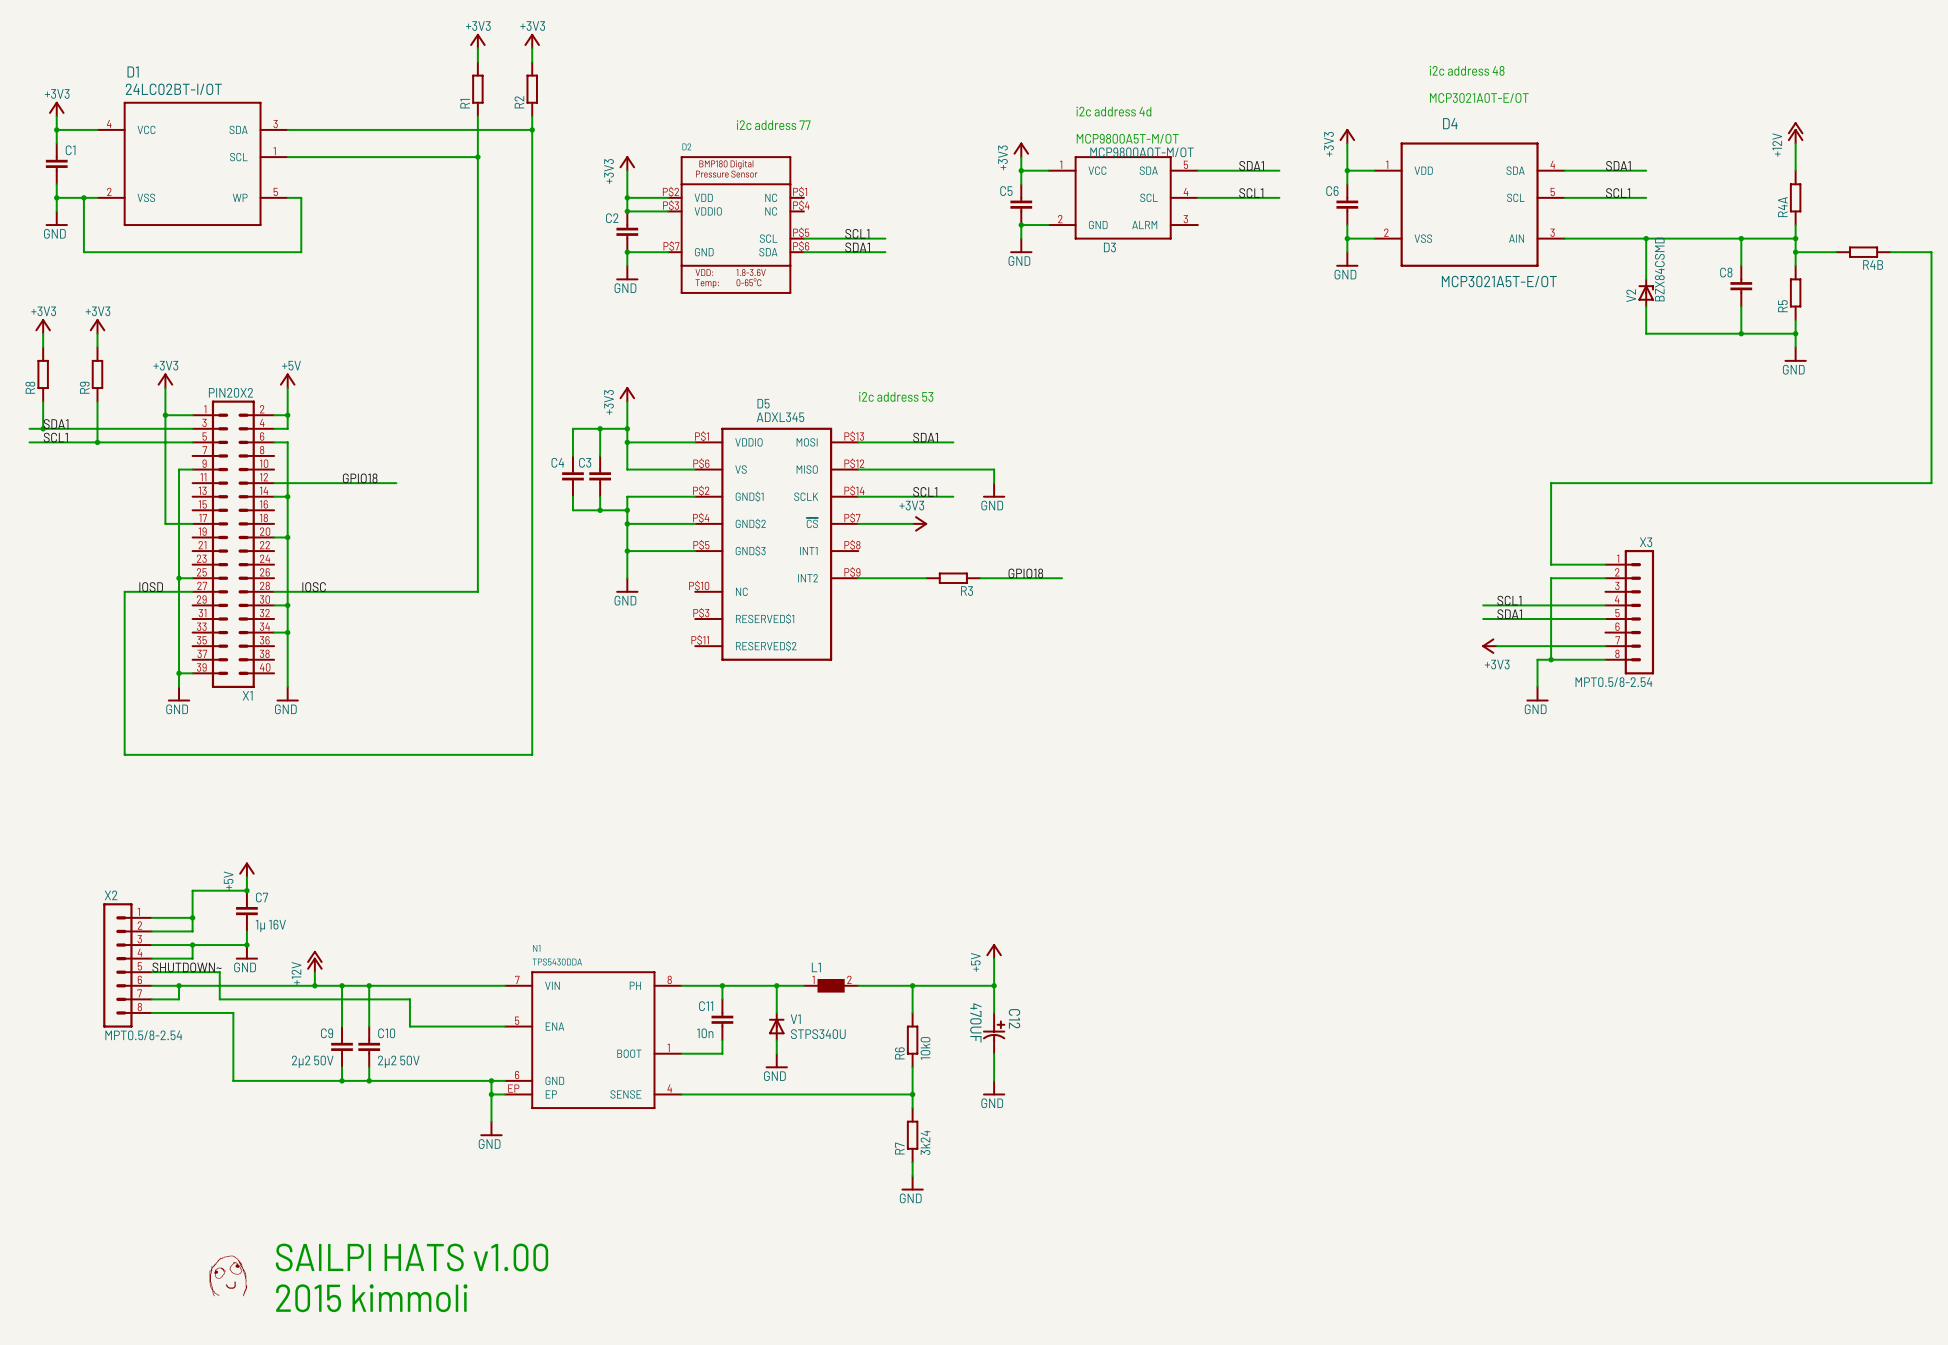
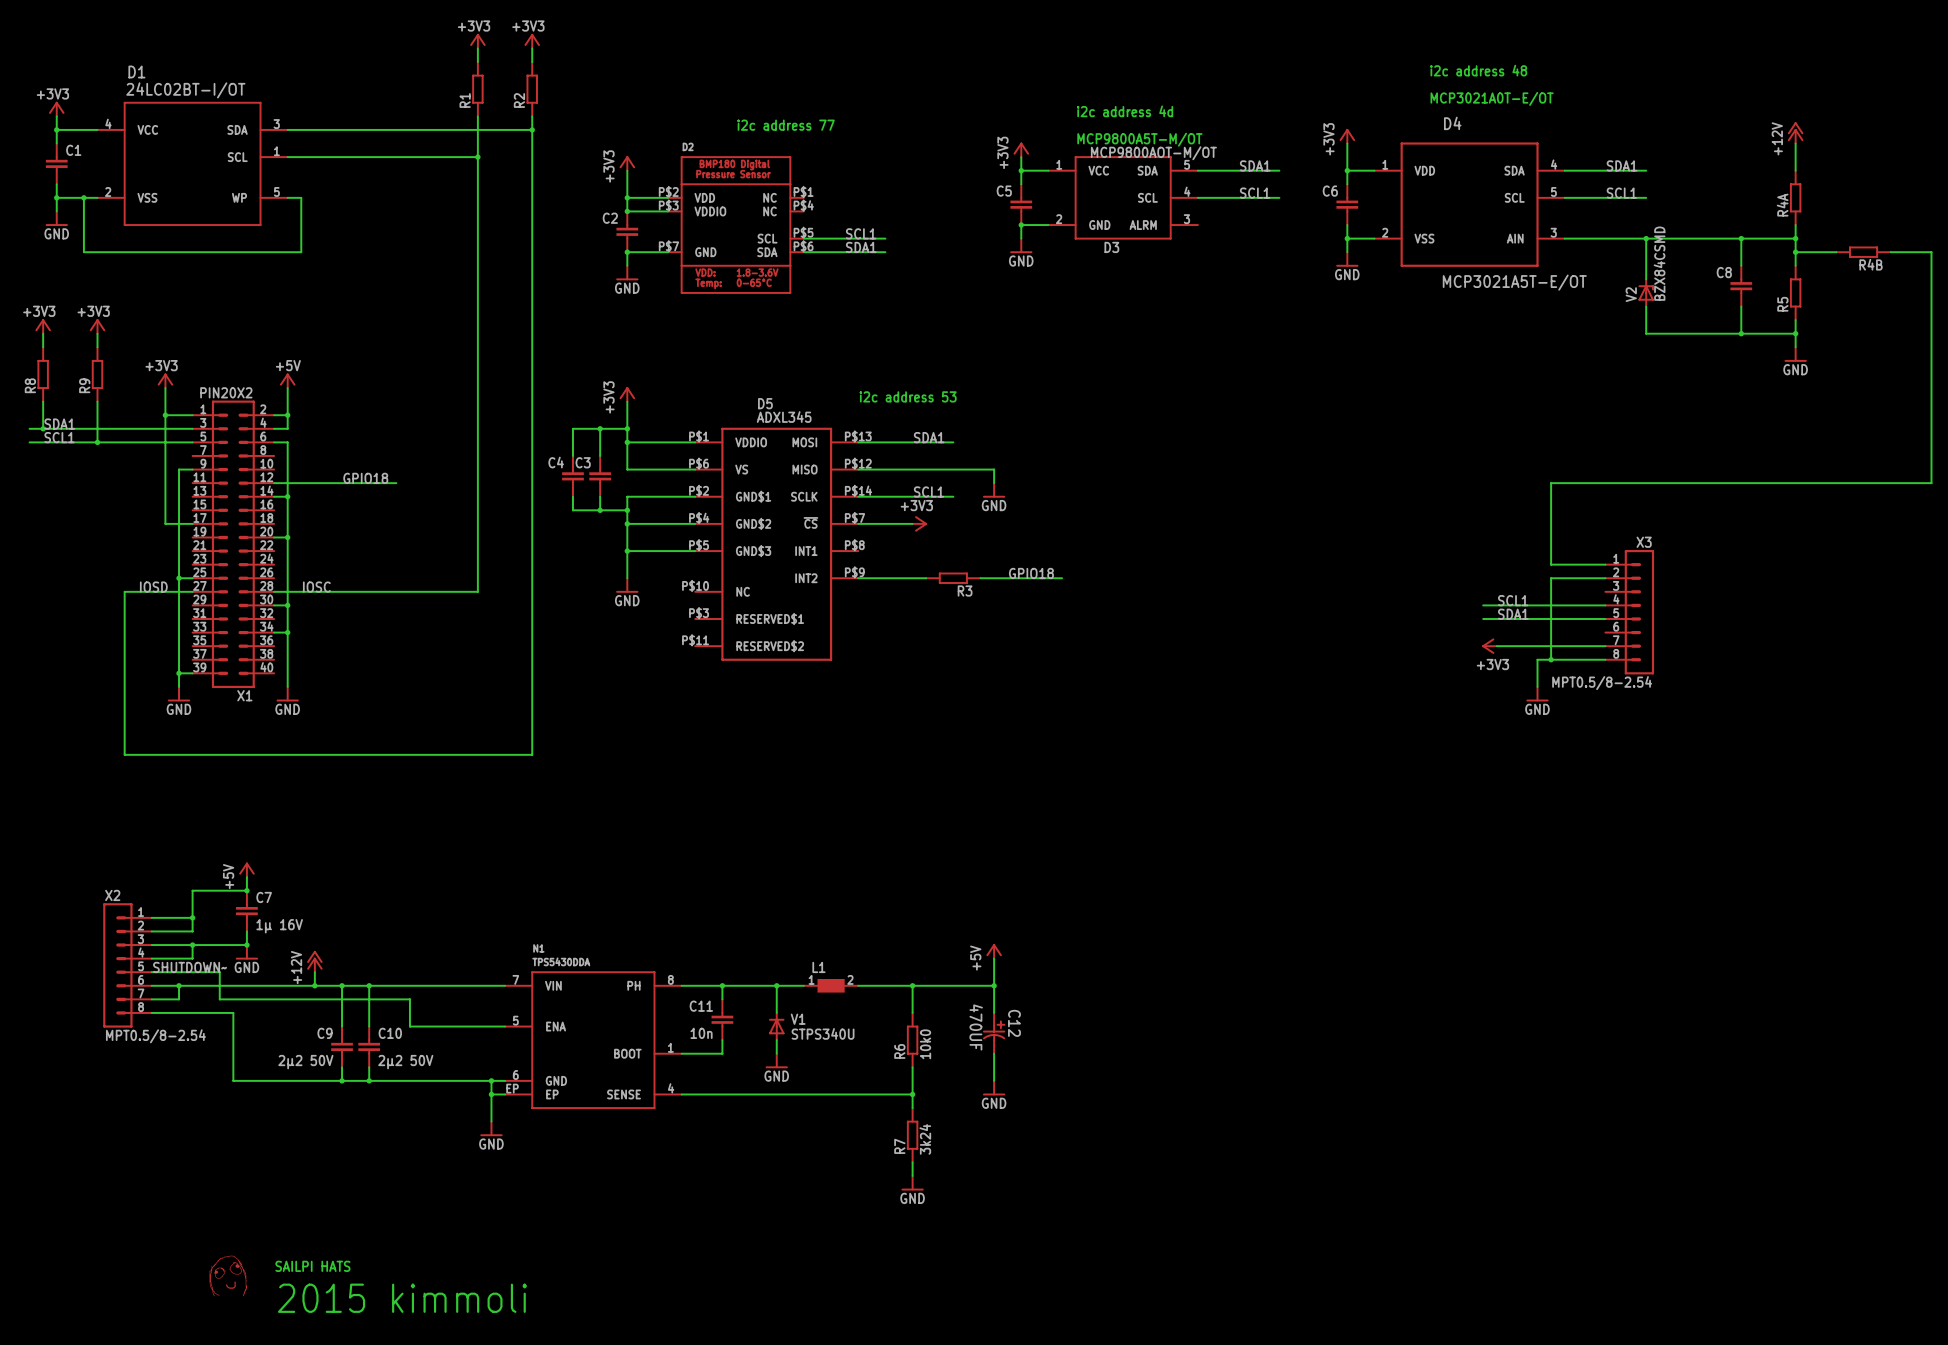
text: SAILPI HATS v1.00 (412, 1257) -> SAILPI HATS (312, 1266)

